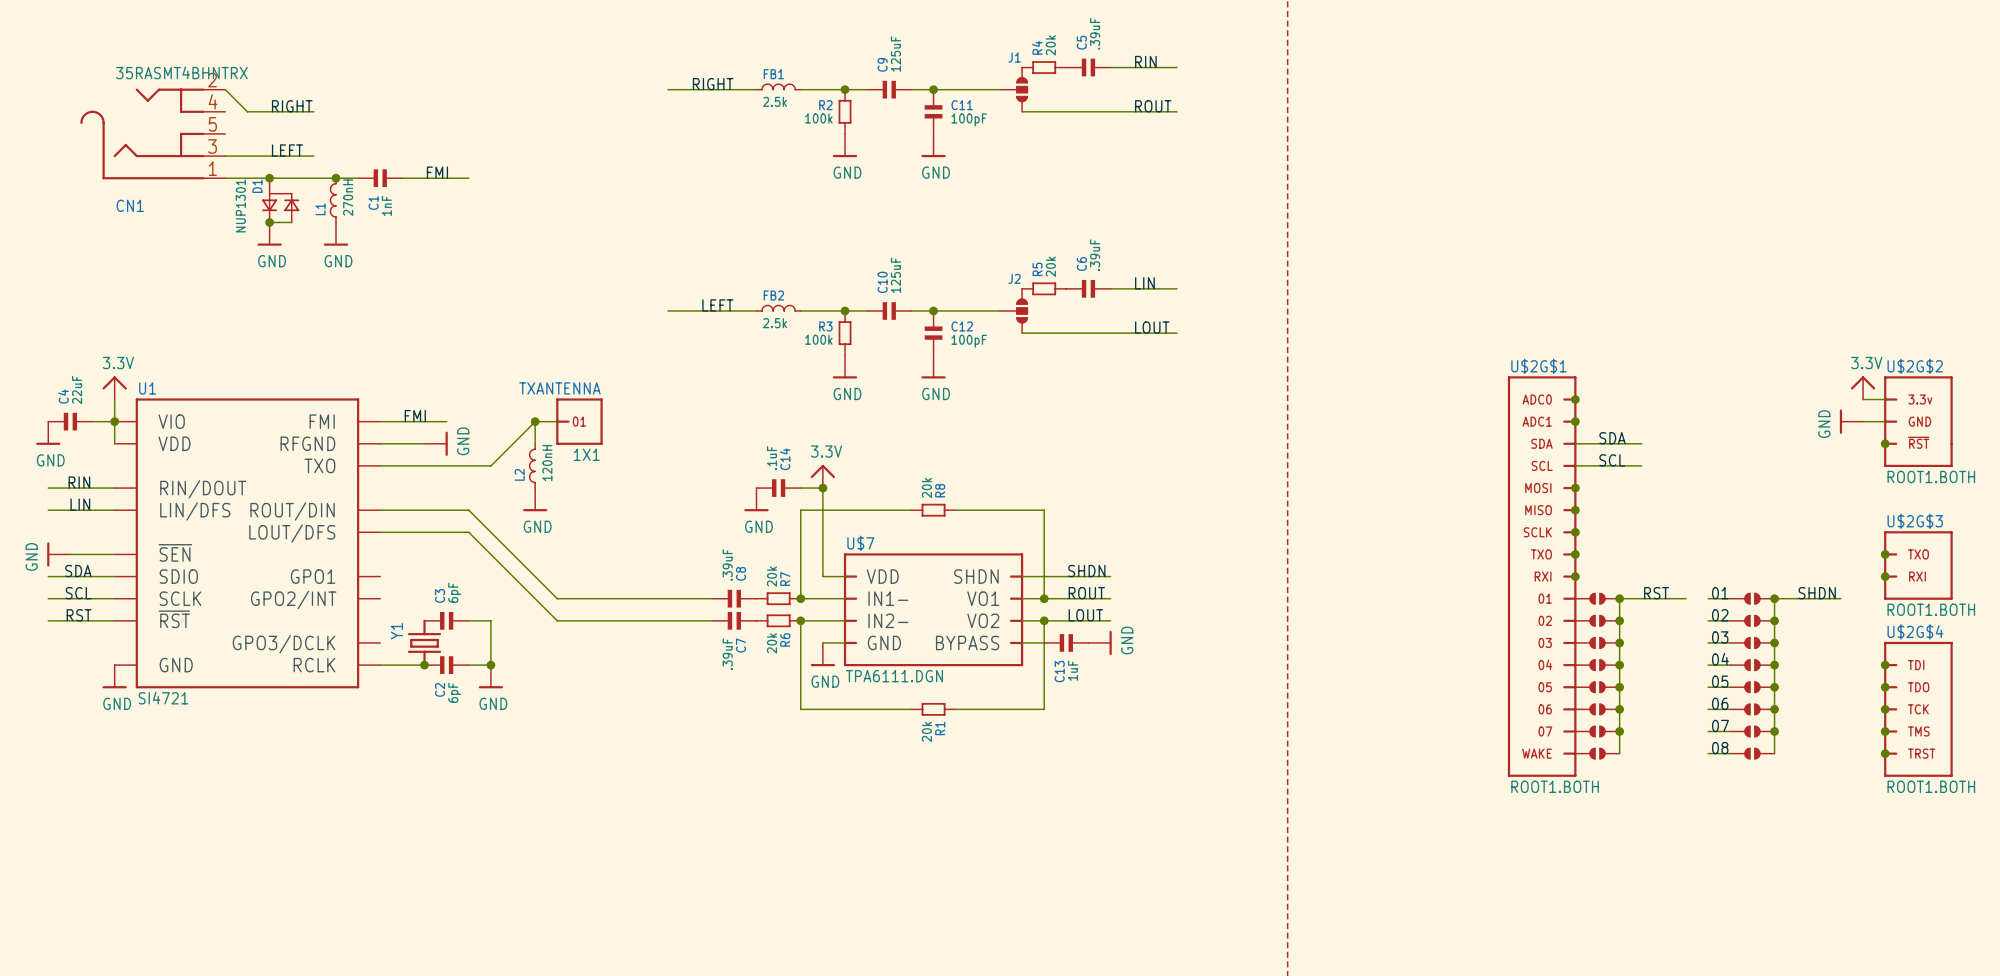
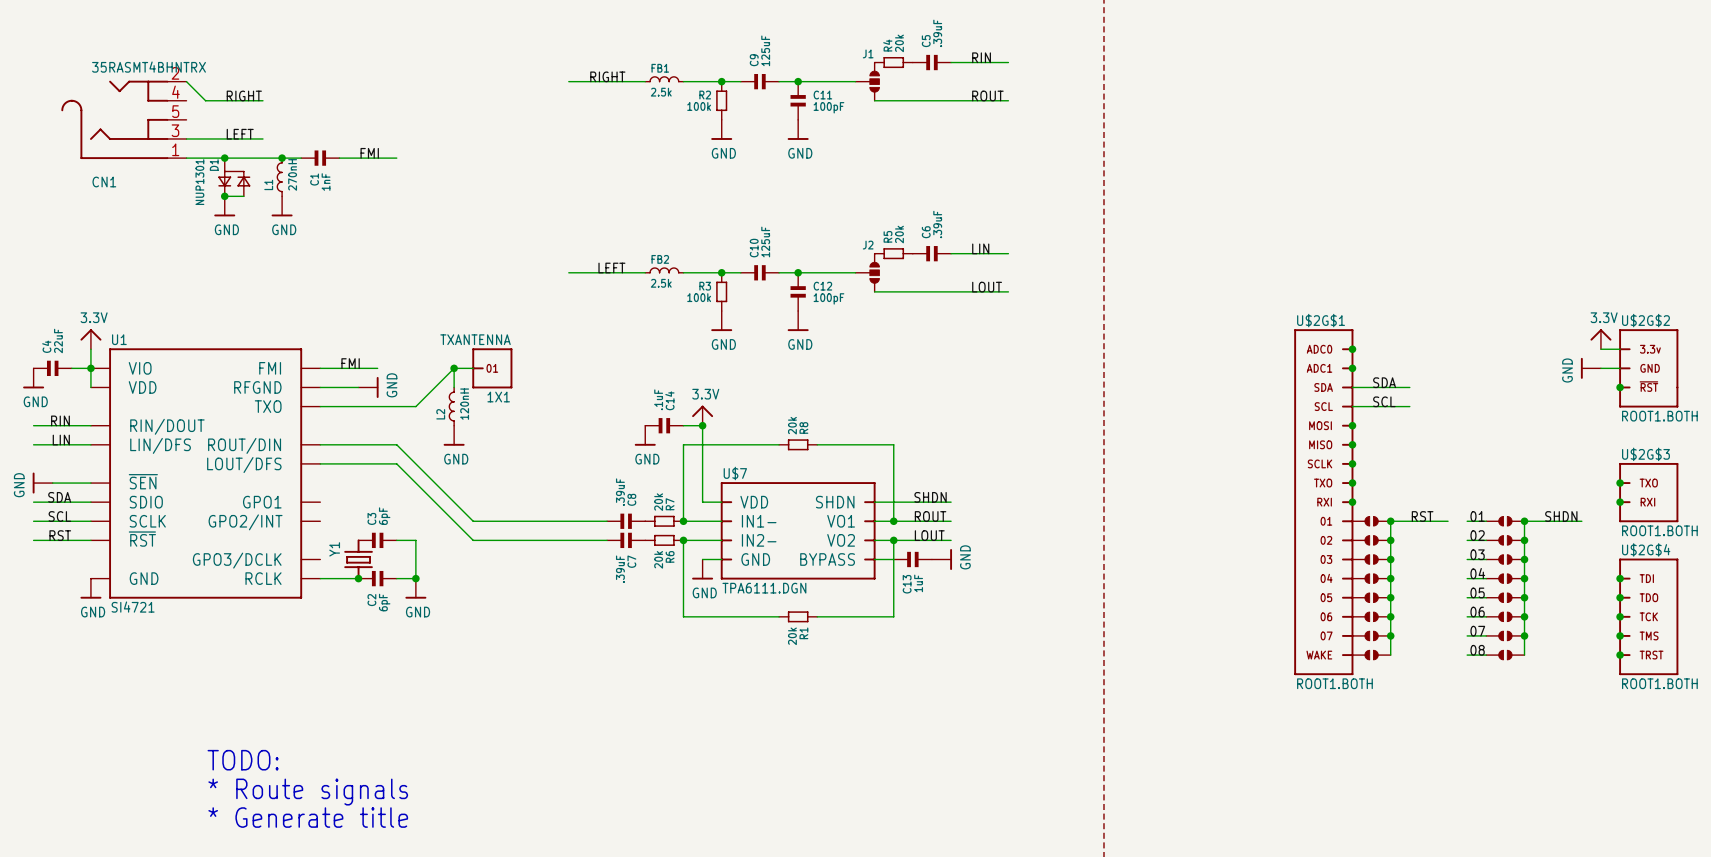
text: none -> TODO: (243, 760)
text: none -> * Route signals (308, 792)
text: none -> * Generate title (308, 817)

